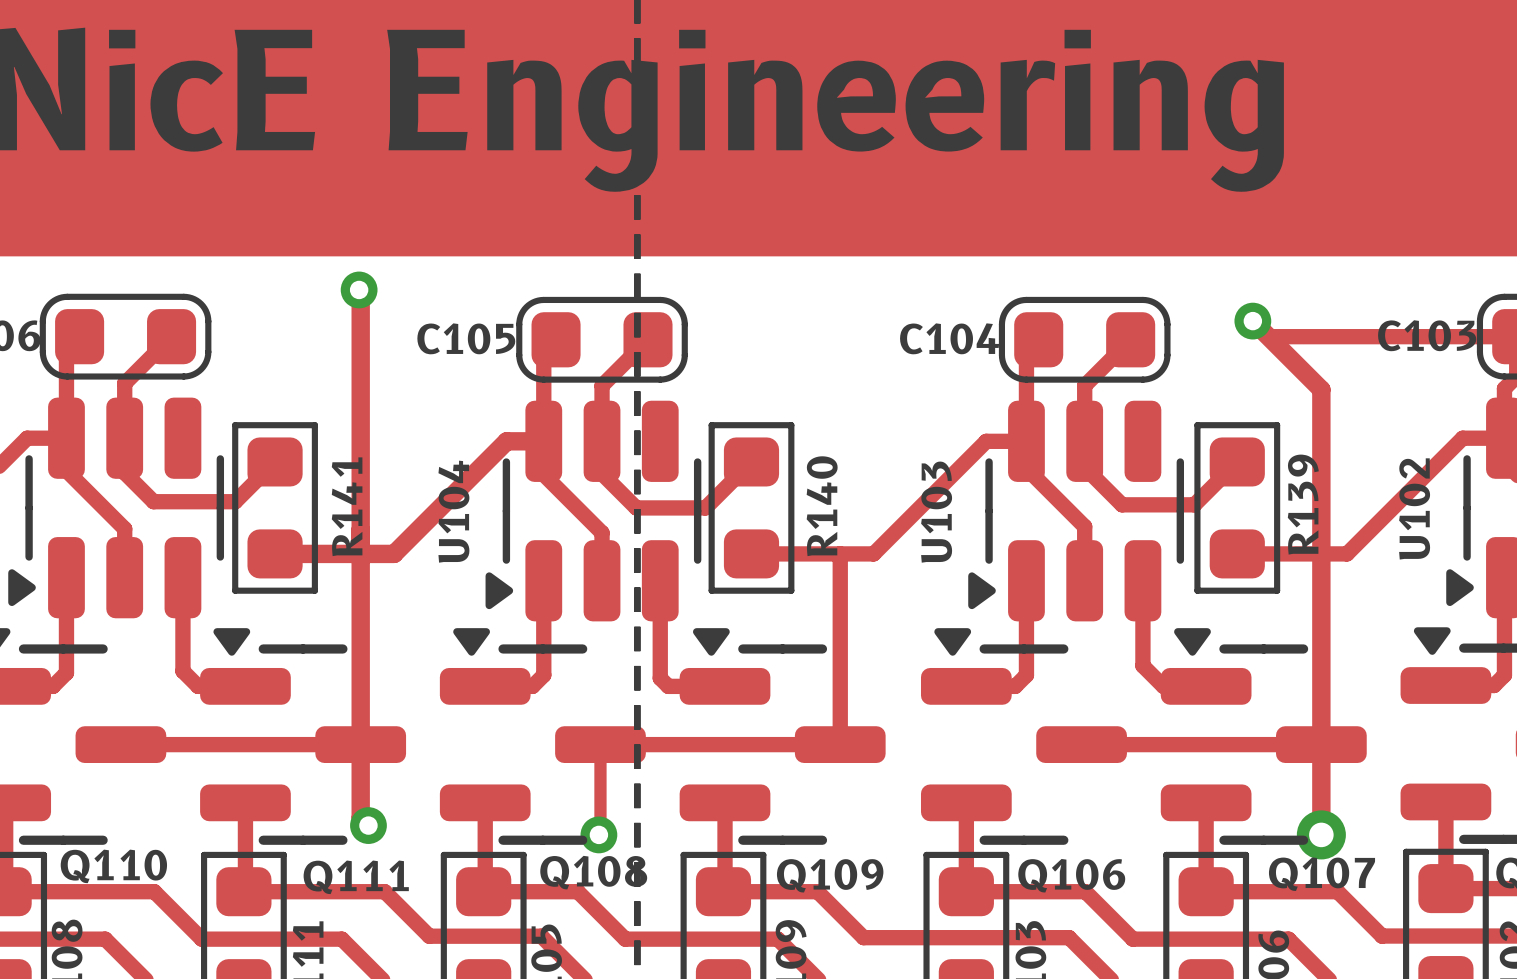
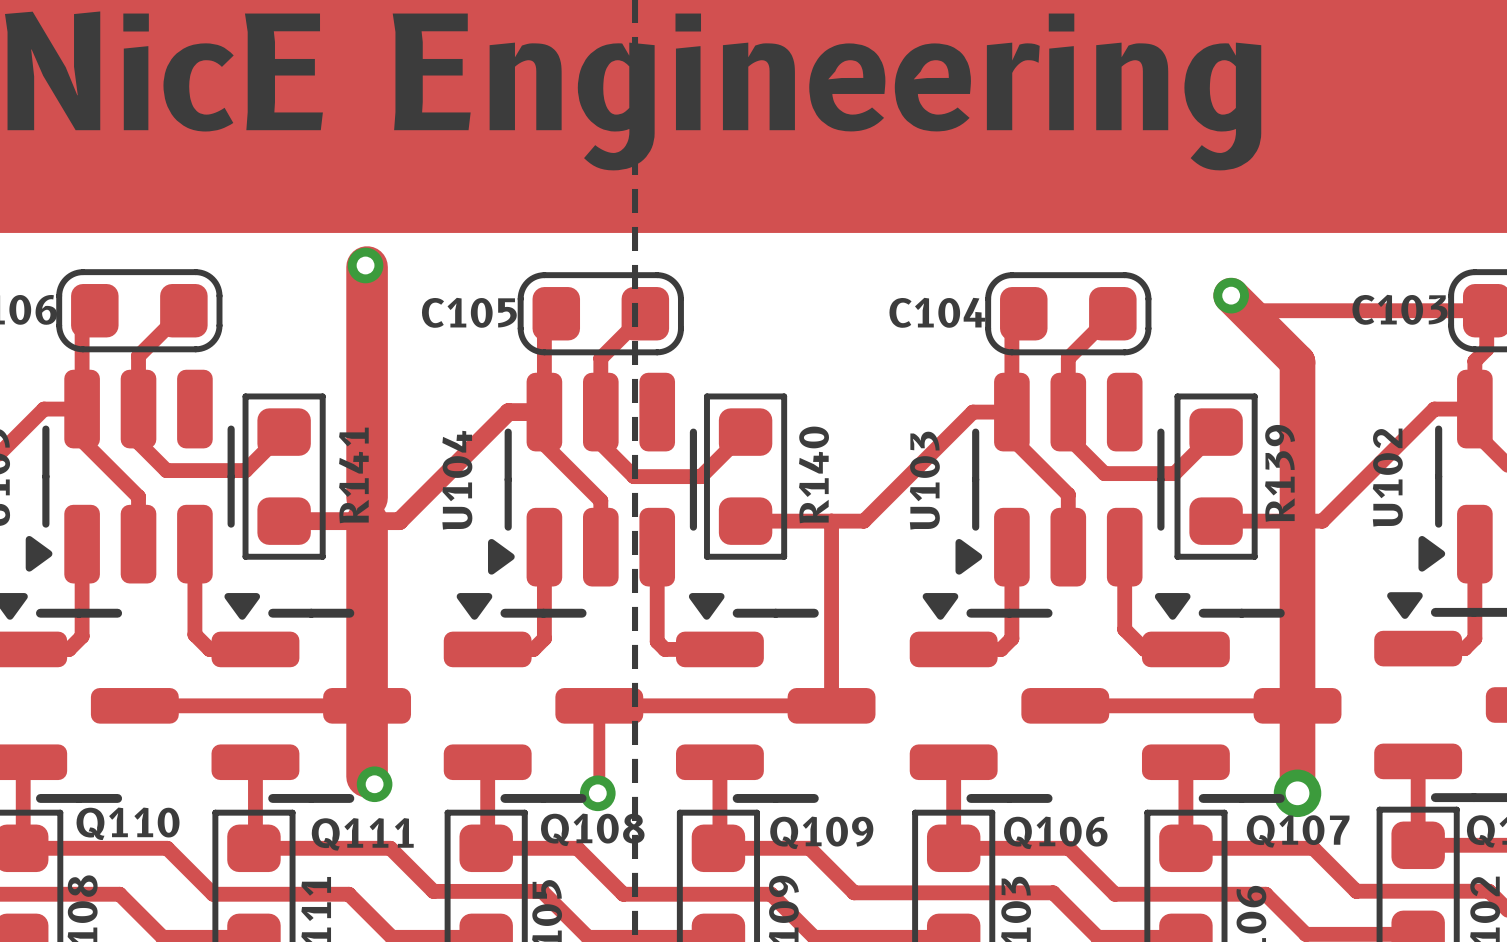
track width: thin (360, 291) (360, 529) -> thick (367, 267) (367, 497)
track width: thin (1252, 321) (1321, 389) (1321, 834) -> thick (1231, 295) (1297, 362) (1297, 793)
track width: thin (360, 553) (360, 817) -> thick (367, 521) (367, 776)

